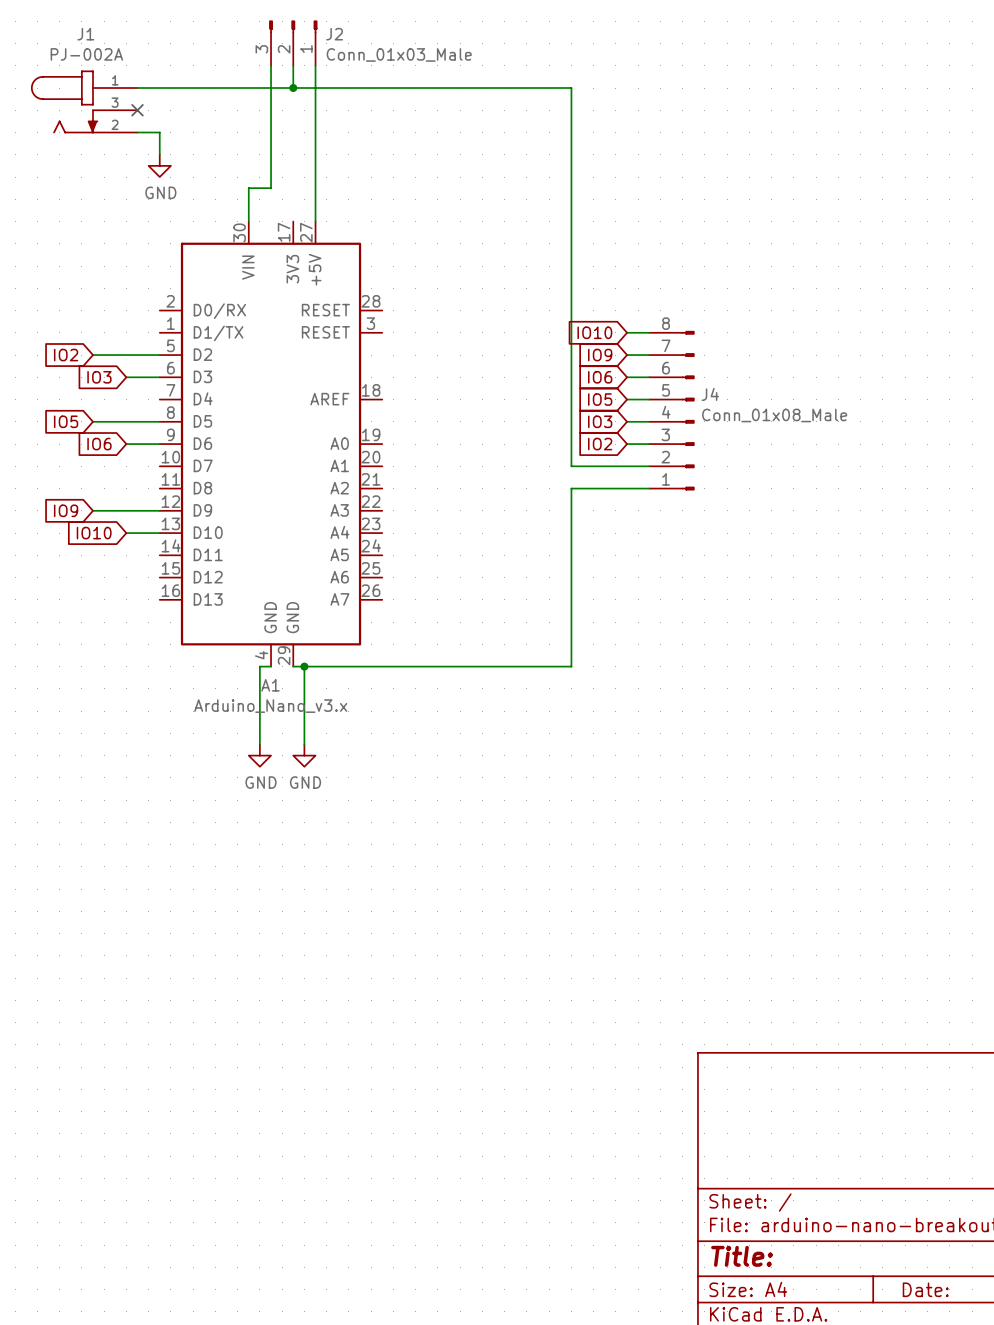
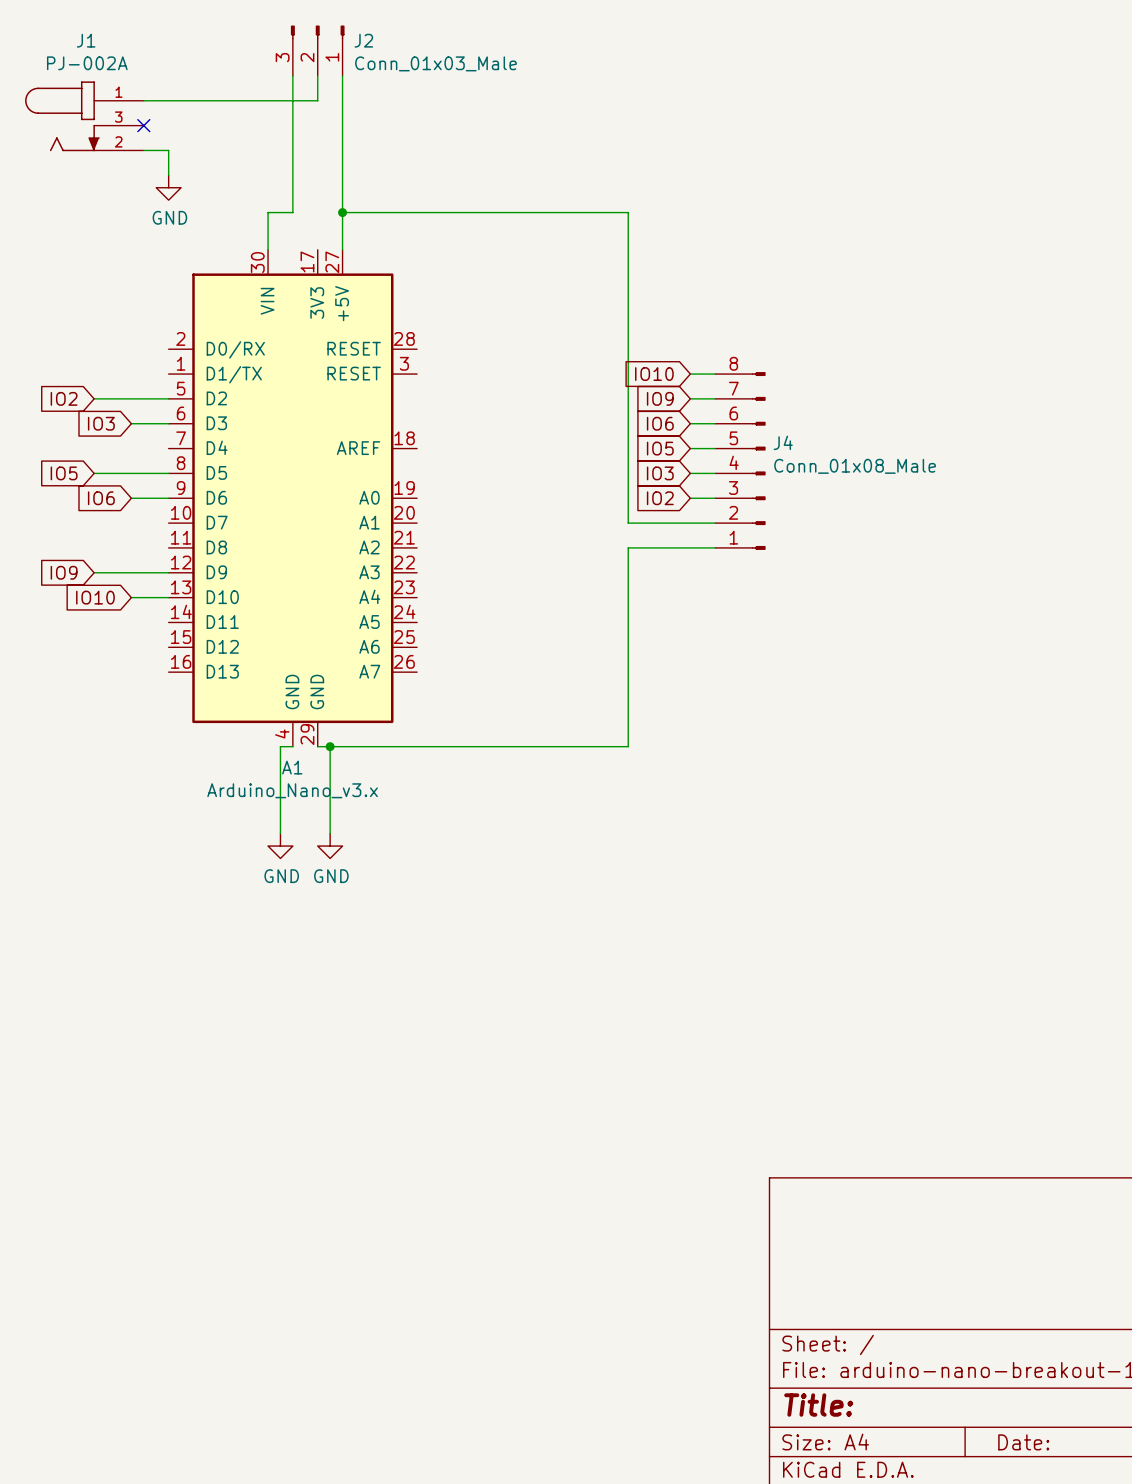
wire: (293, 88) (571, 88) (571, 188) -> (342, 212) (628, 212)
junction: (293, 88) -> none
junction: none -> (342, 212)

